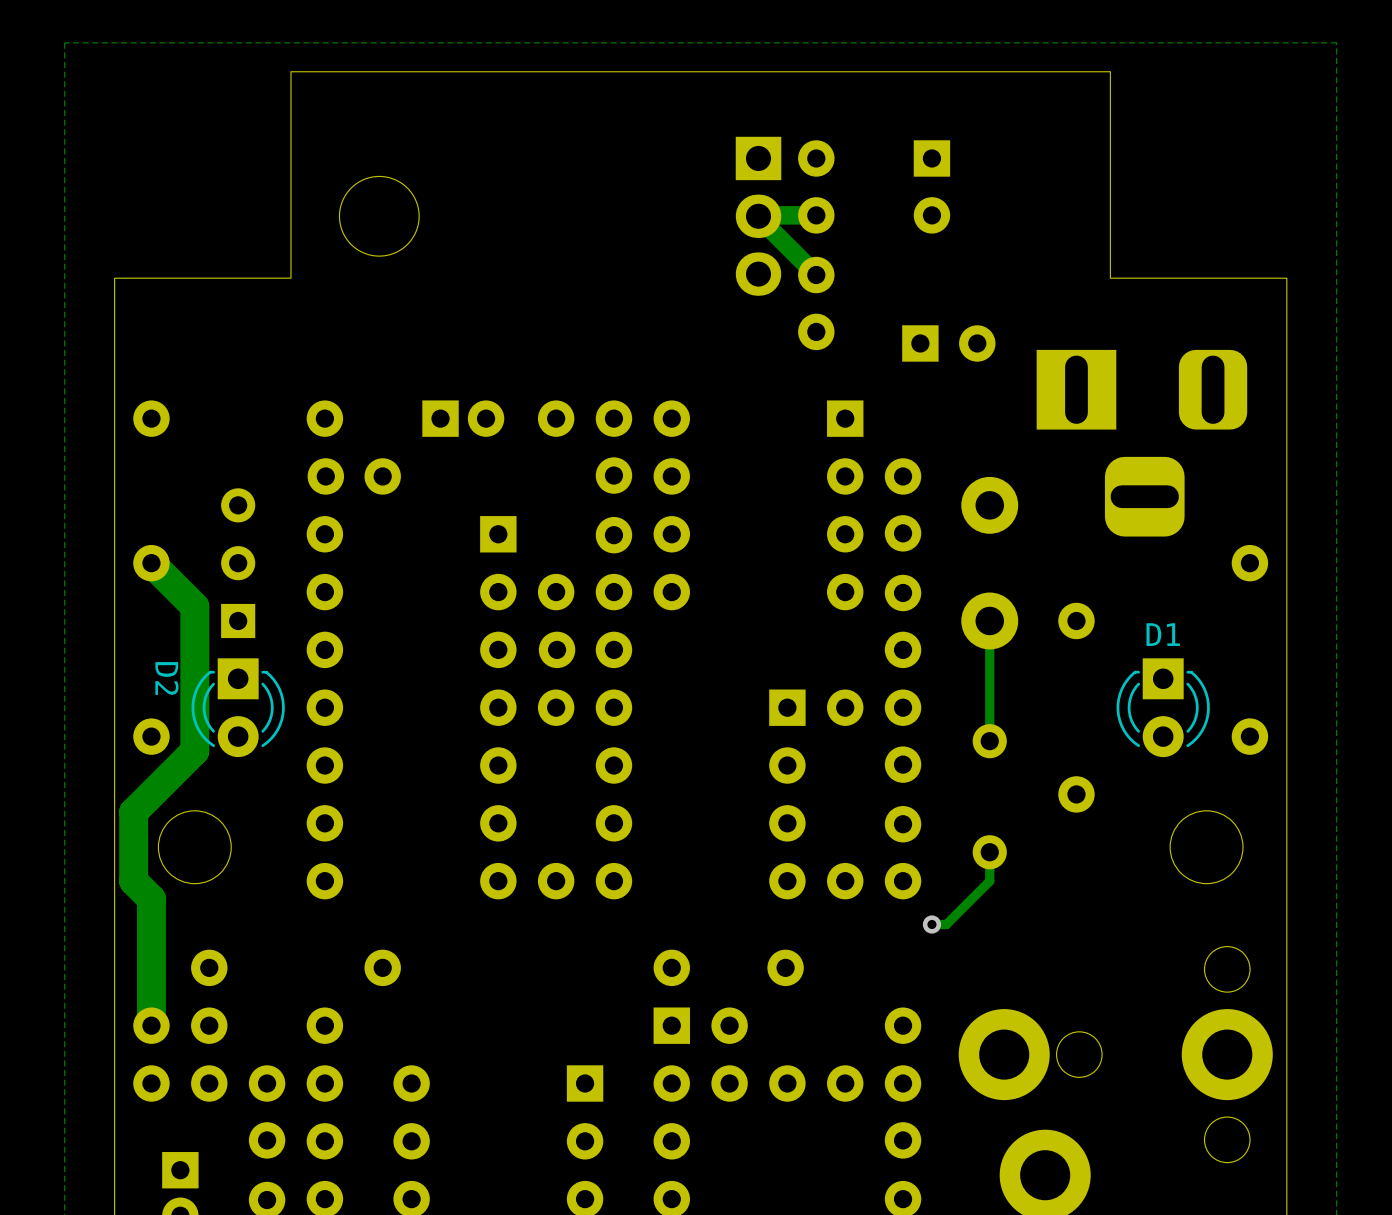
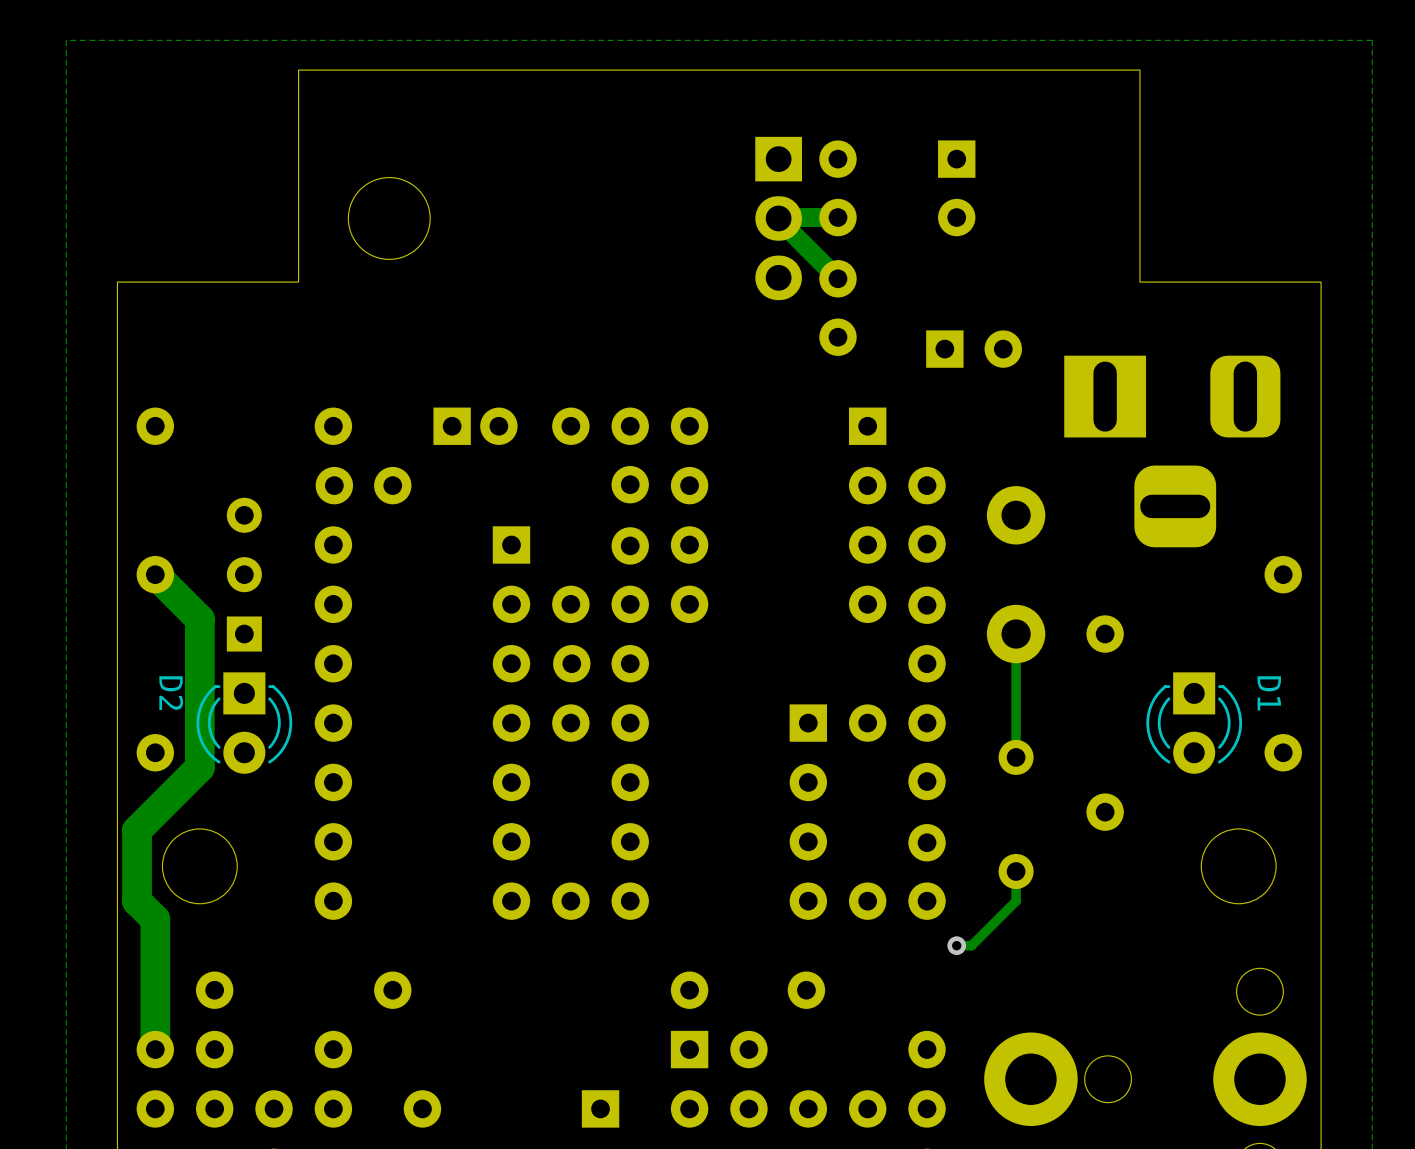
D1 name rotation: 0° (1163, 634) -> 90° clockwise (1269, 693)
D1 name position: D1 (1163, 634) -> D1 (1269, 693)

